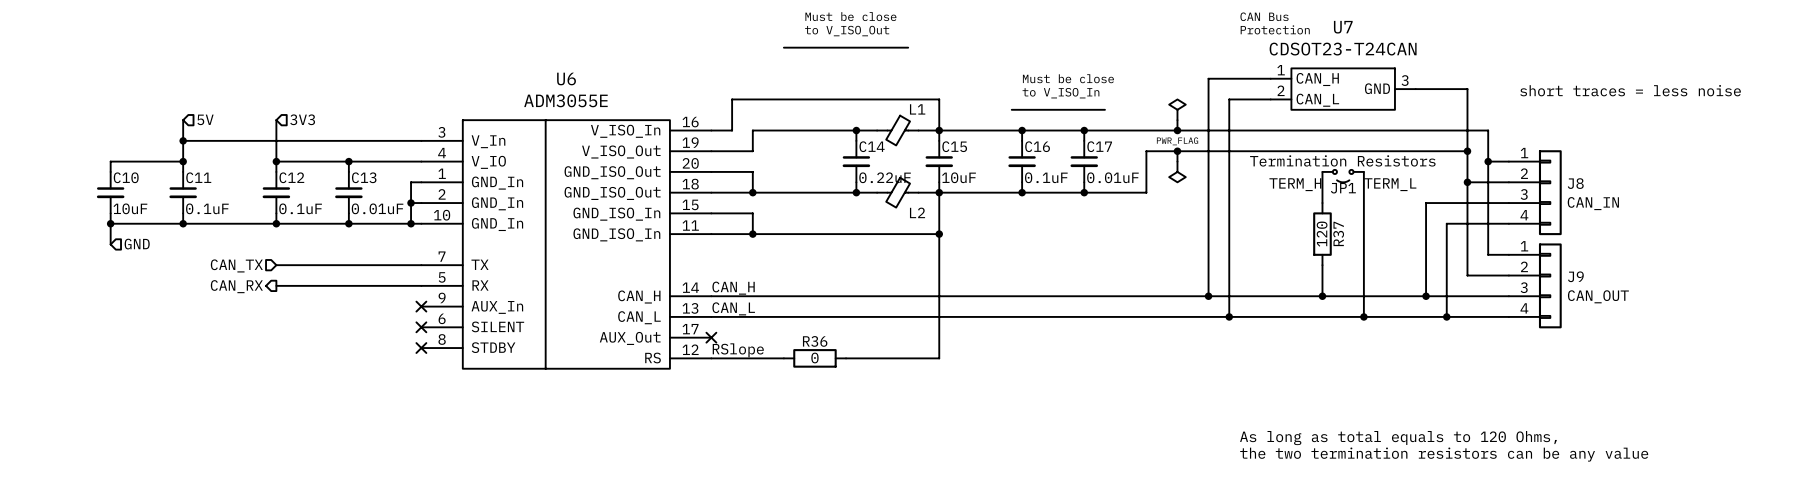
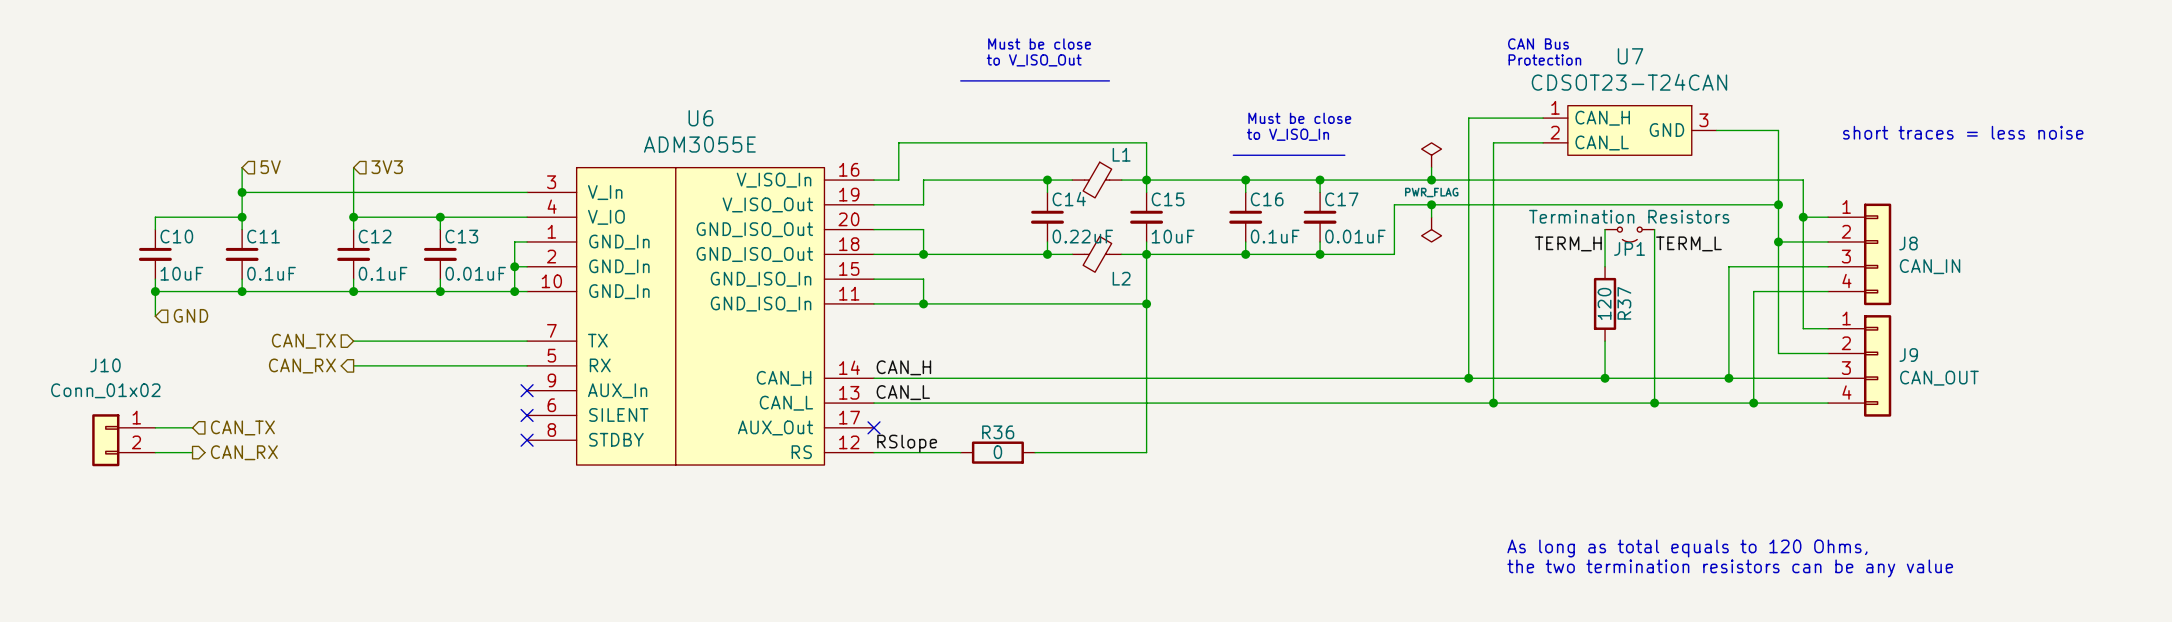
wire: none -> (155, 427) (192, 427)
hierarchical label: none -> CAN_TX (242, 427)
J10: none -> Conn_01x02 (123, 440)
wire: none -> (155, 452) (192, 452)
hierarchical label: none -> CAN_RX (244, 452)

